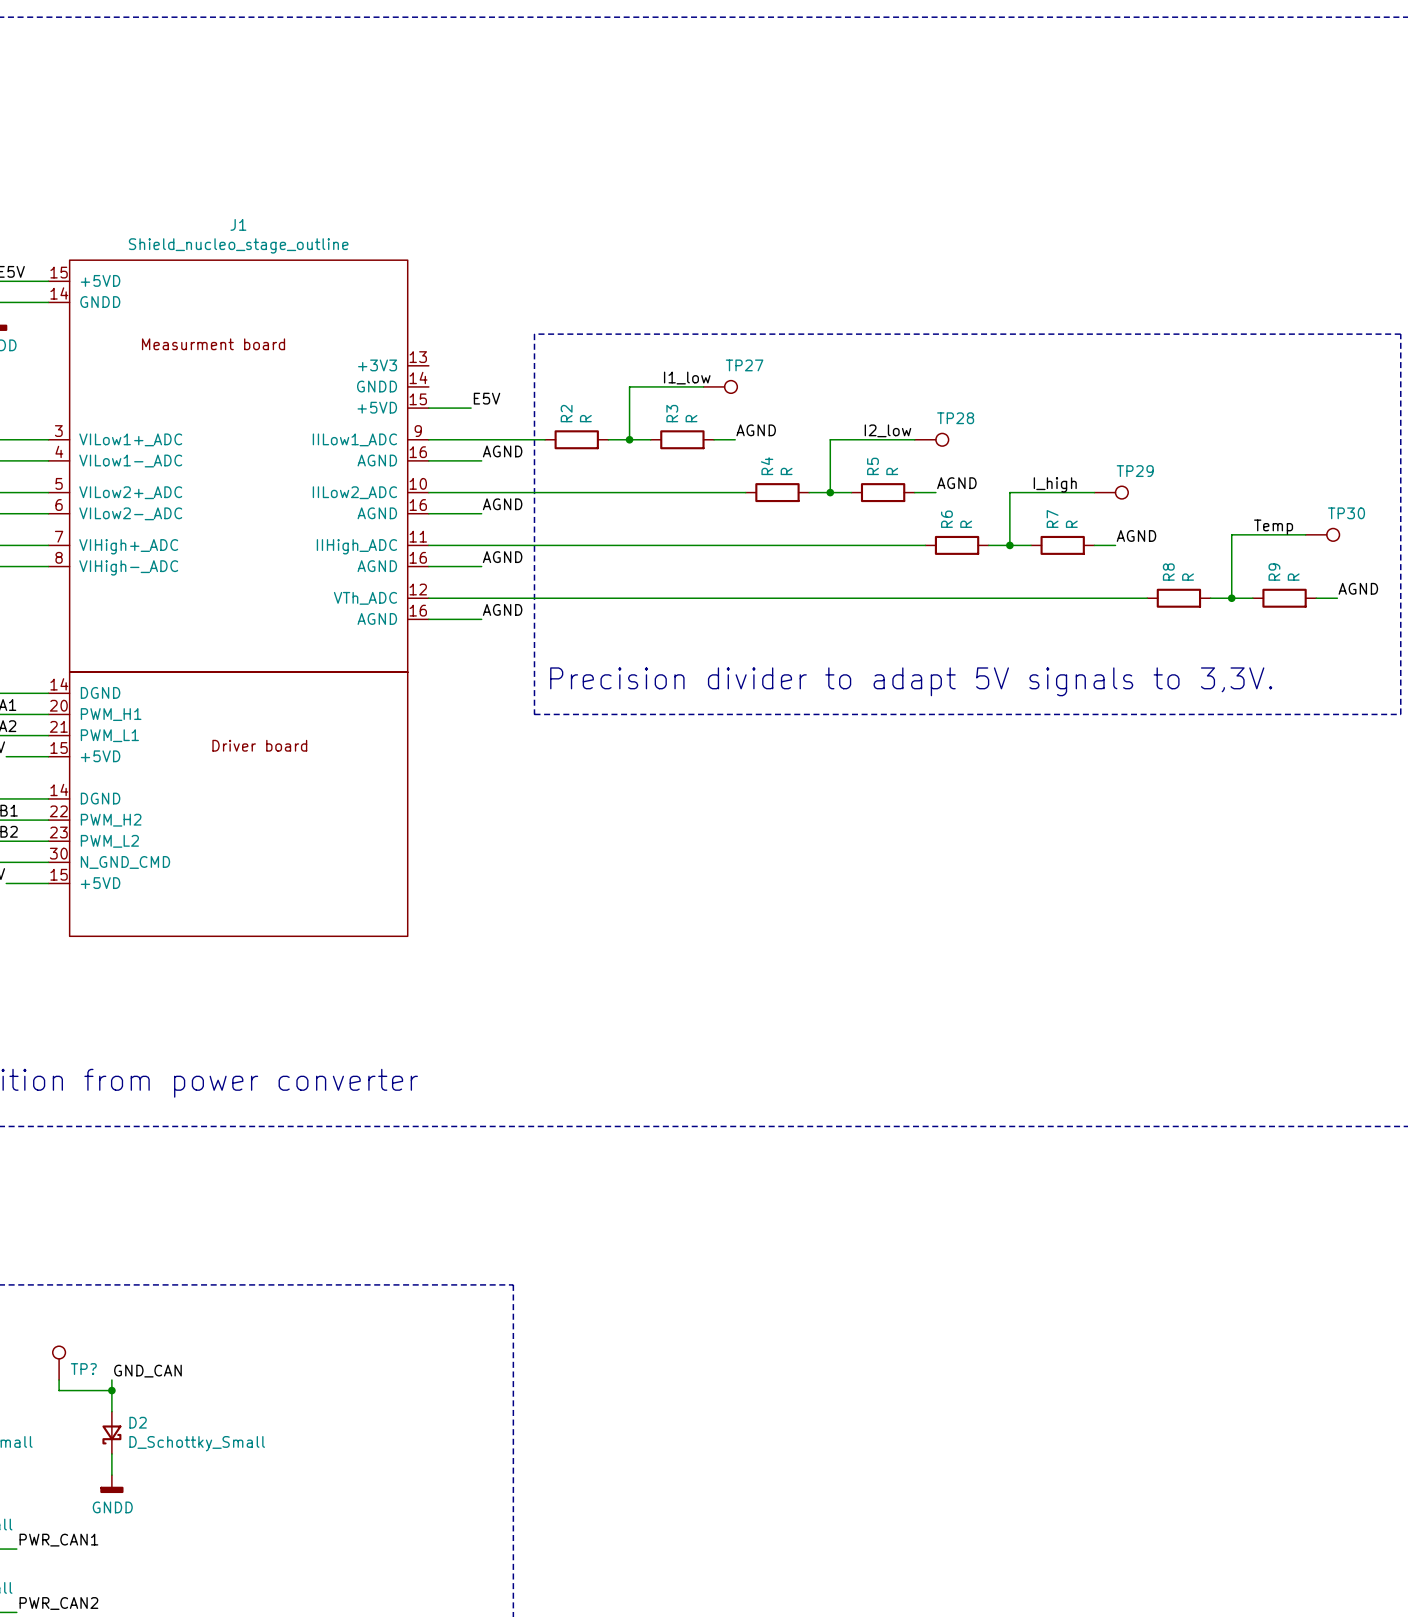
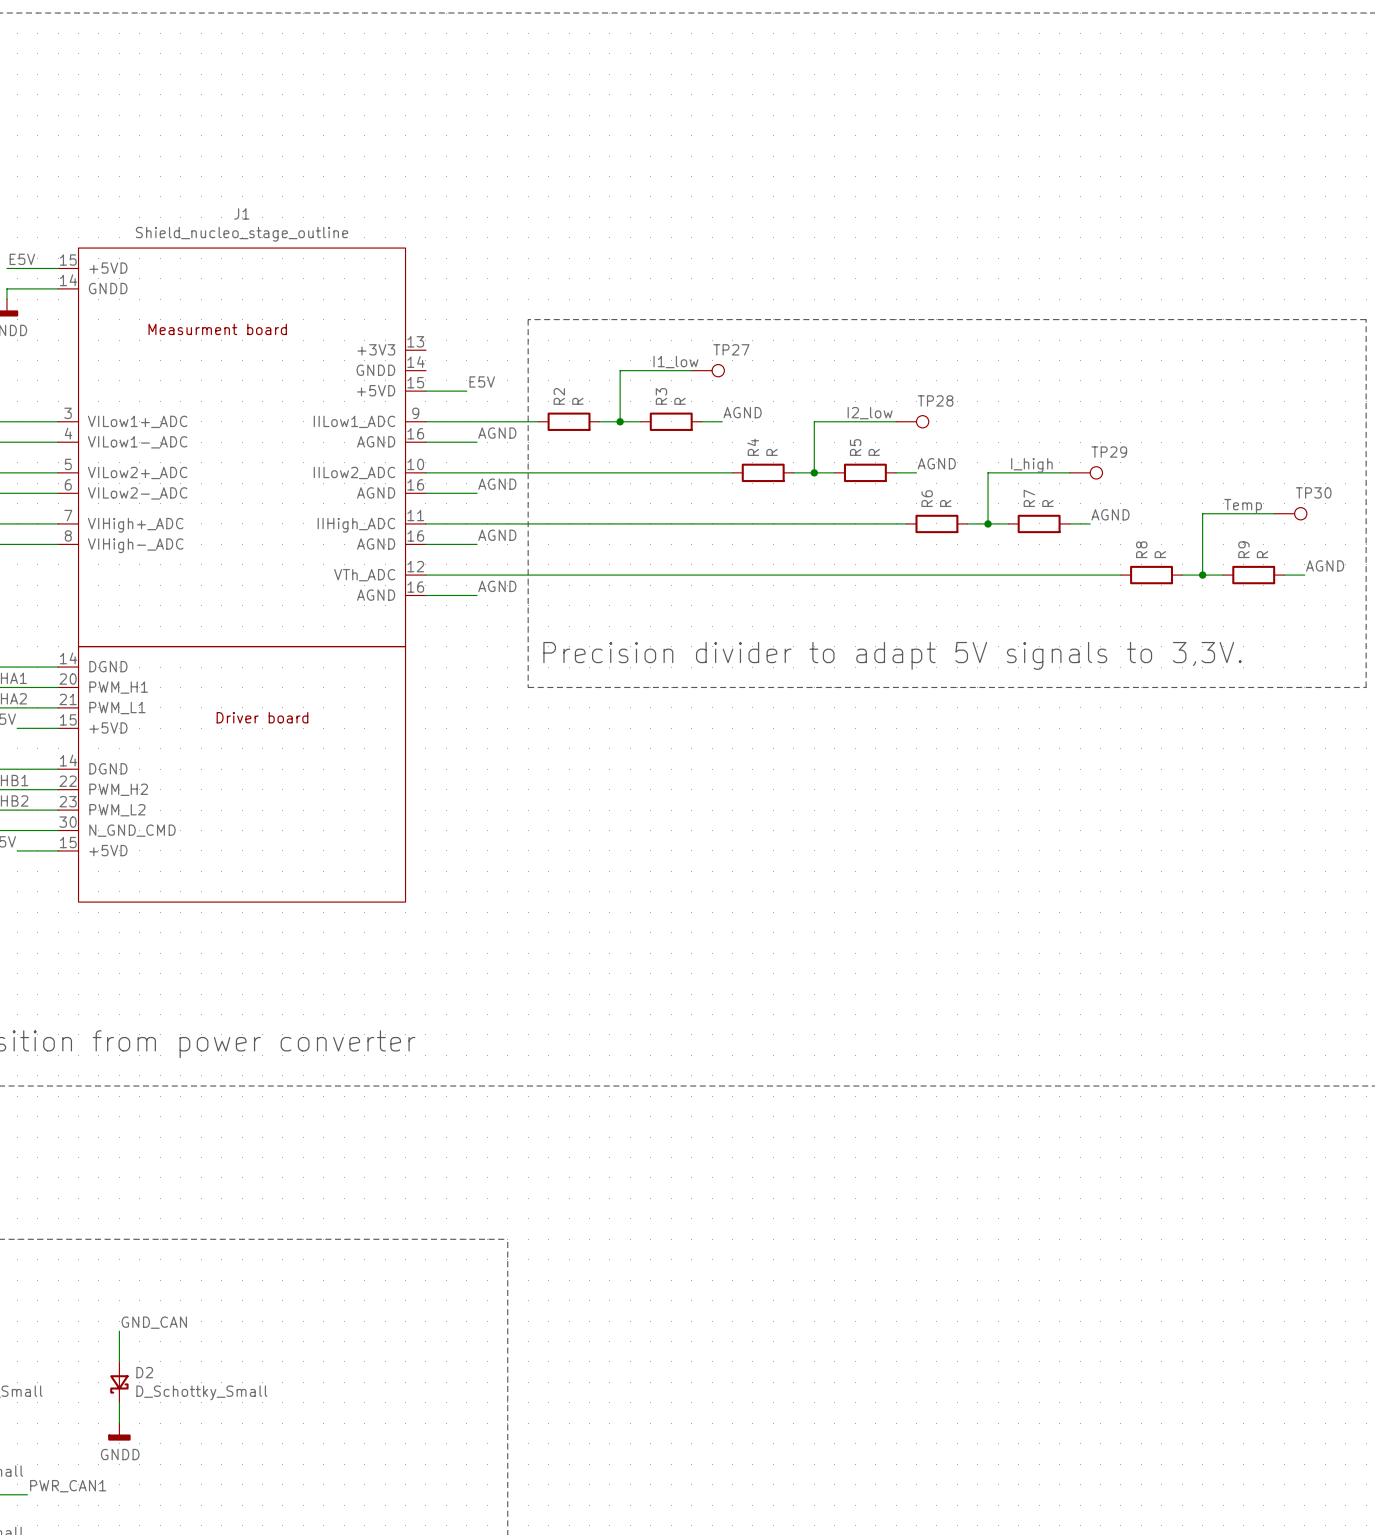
TP?: (59, 1363) -> none
wire: (59, 1380) (59, 1390) (111, 1390) -> none
junction: (111, 1390) -> none

